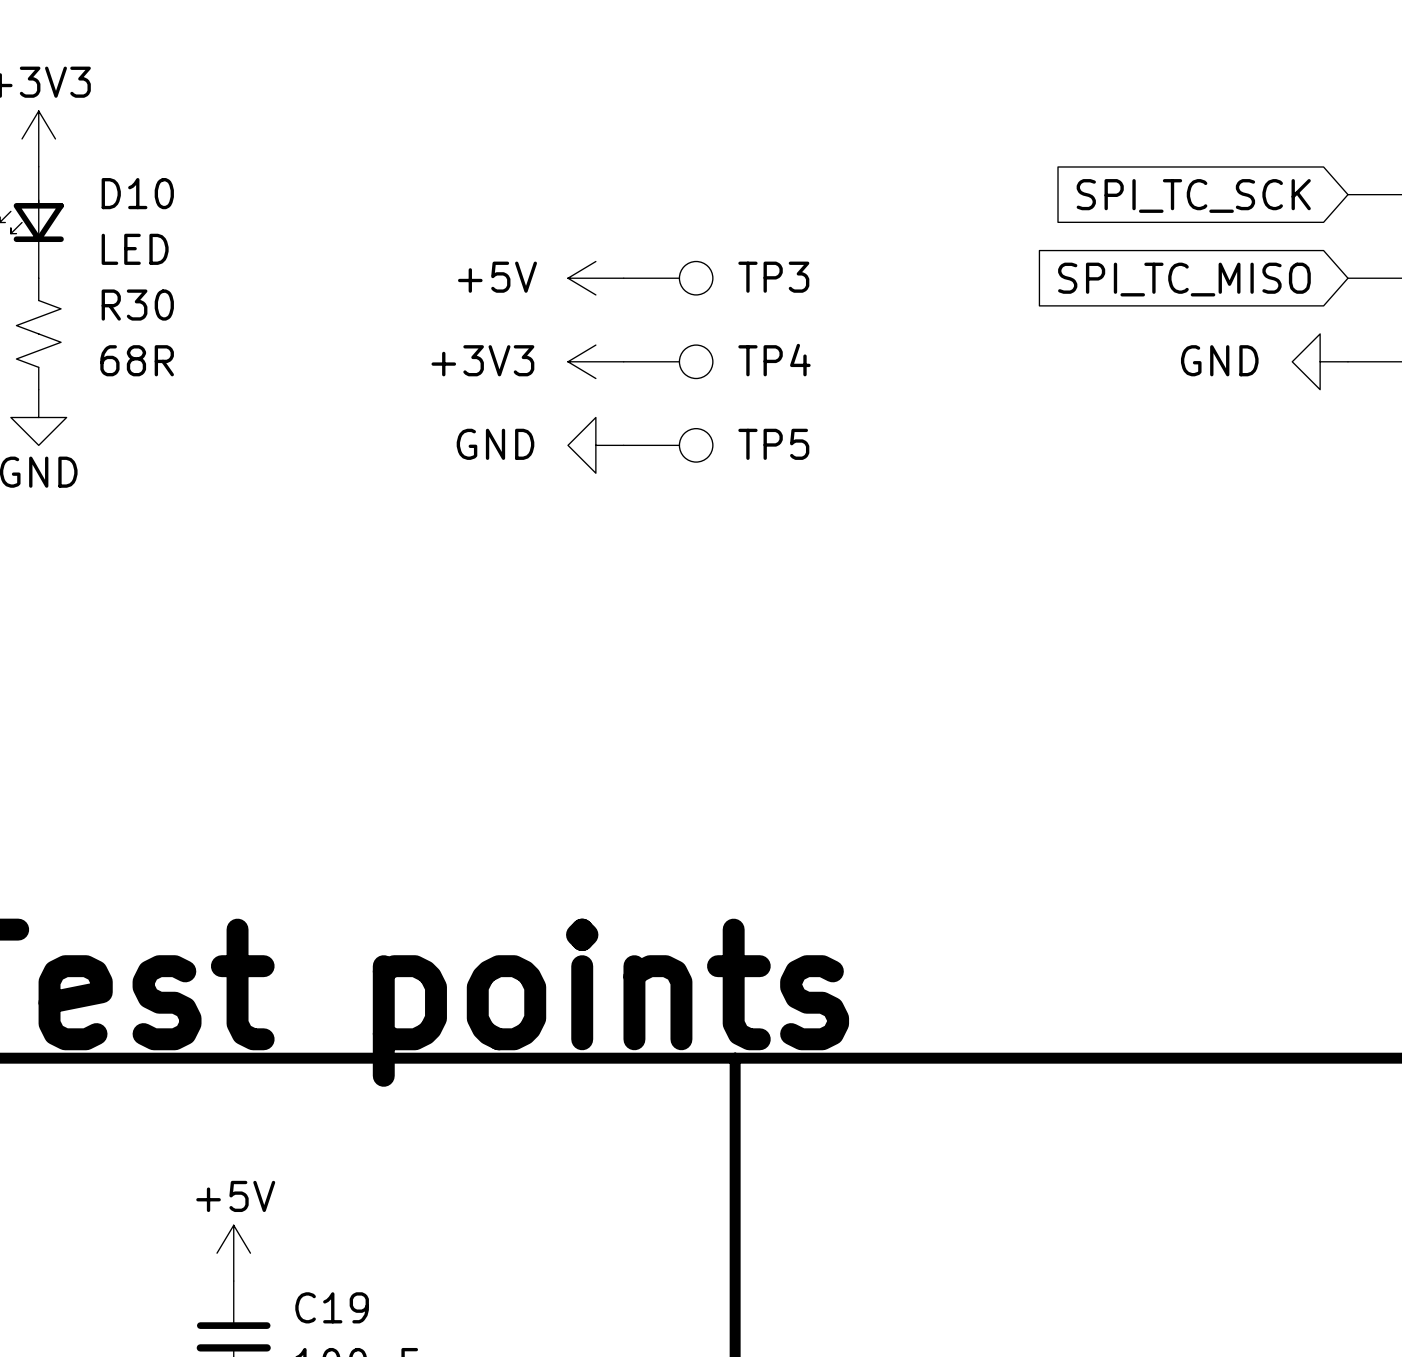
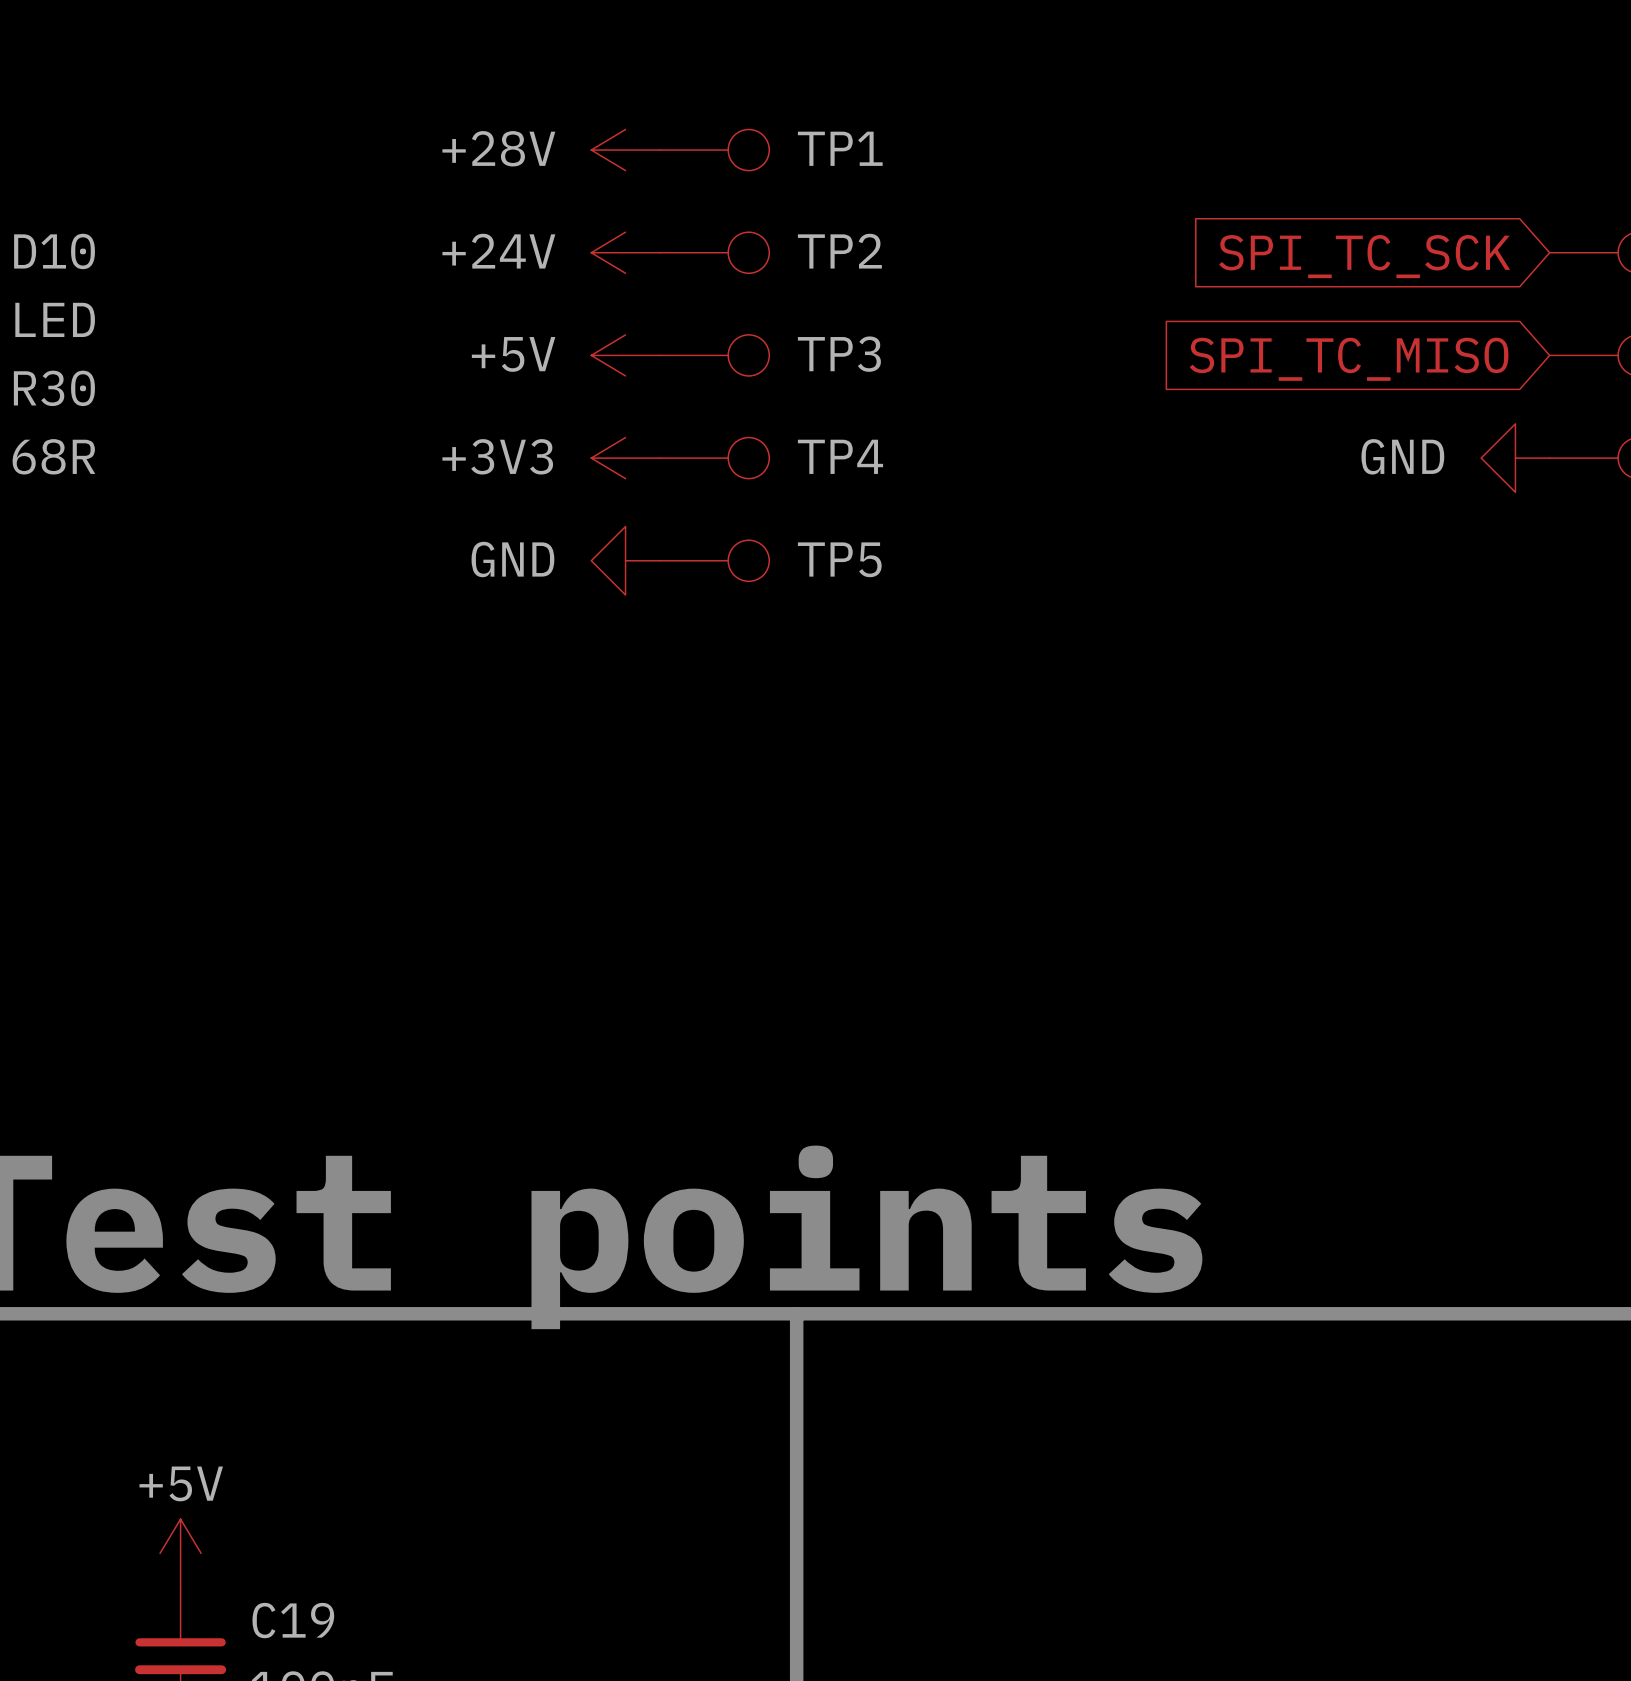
power symbol: none -> +28V (625, 150)
TP1: none -> (714, 150)
power symbol: none -> +24V (625, 252)
TP2: none -> (714, 252)

